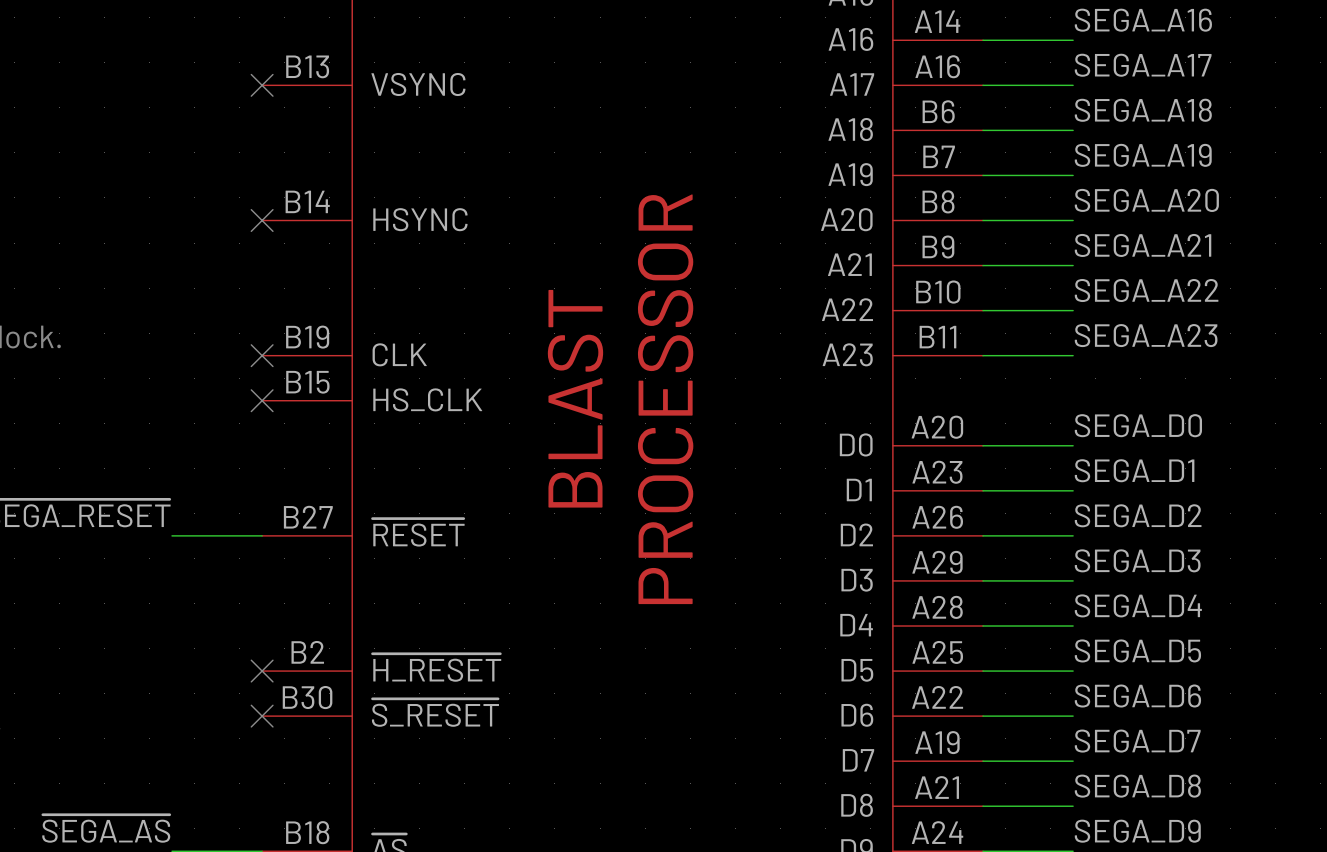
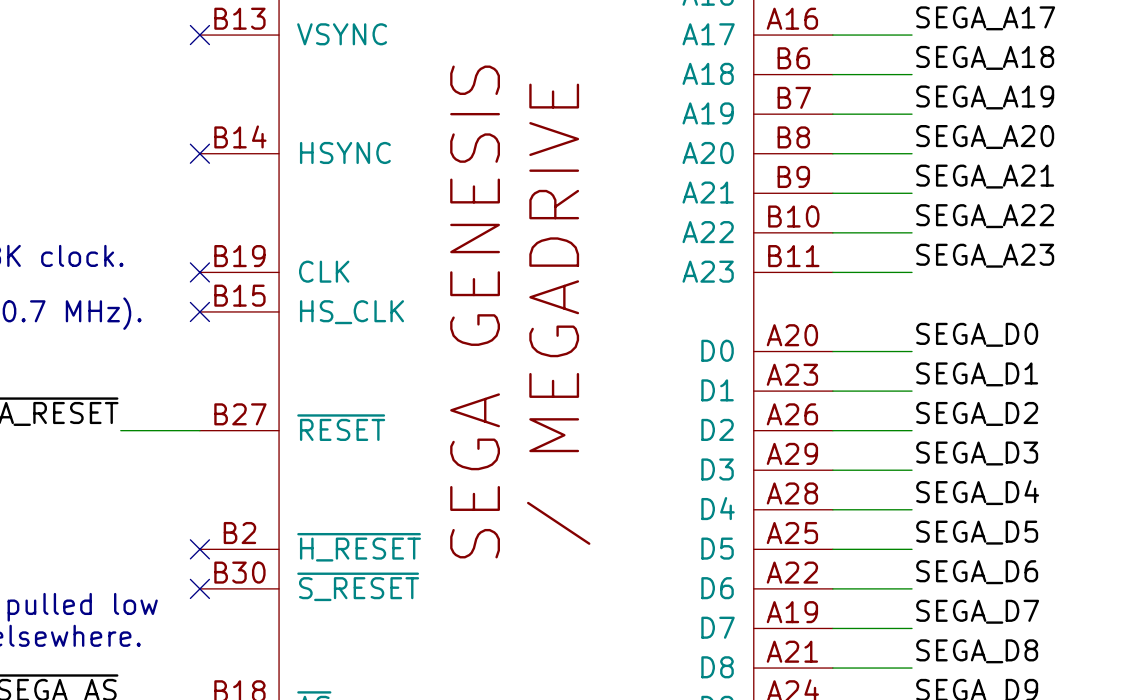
part text: BLAST (575, 398) -> SEGA GENESIS (475, 311)
part text: PROCESSOR (665, 399) -> / MEGADRIVE (558, 314)

